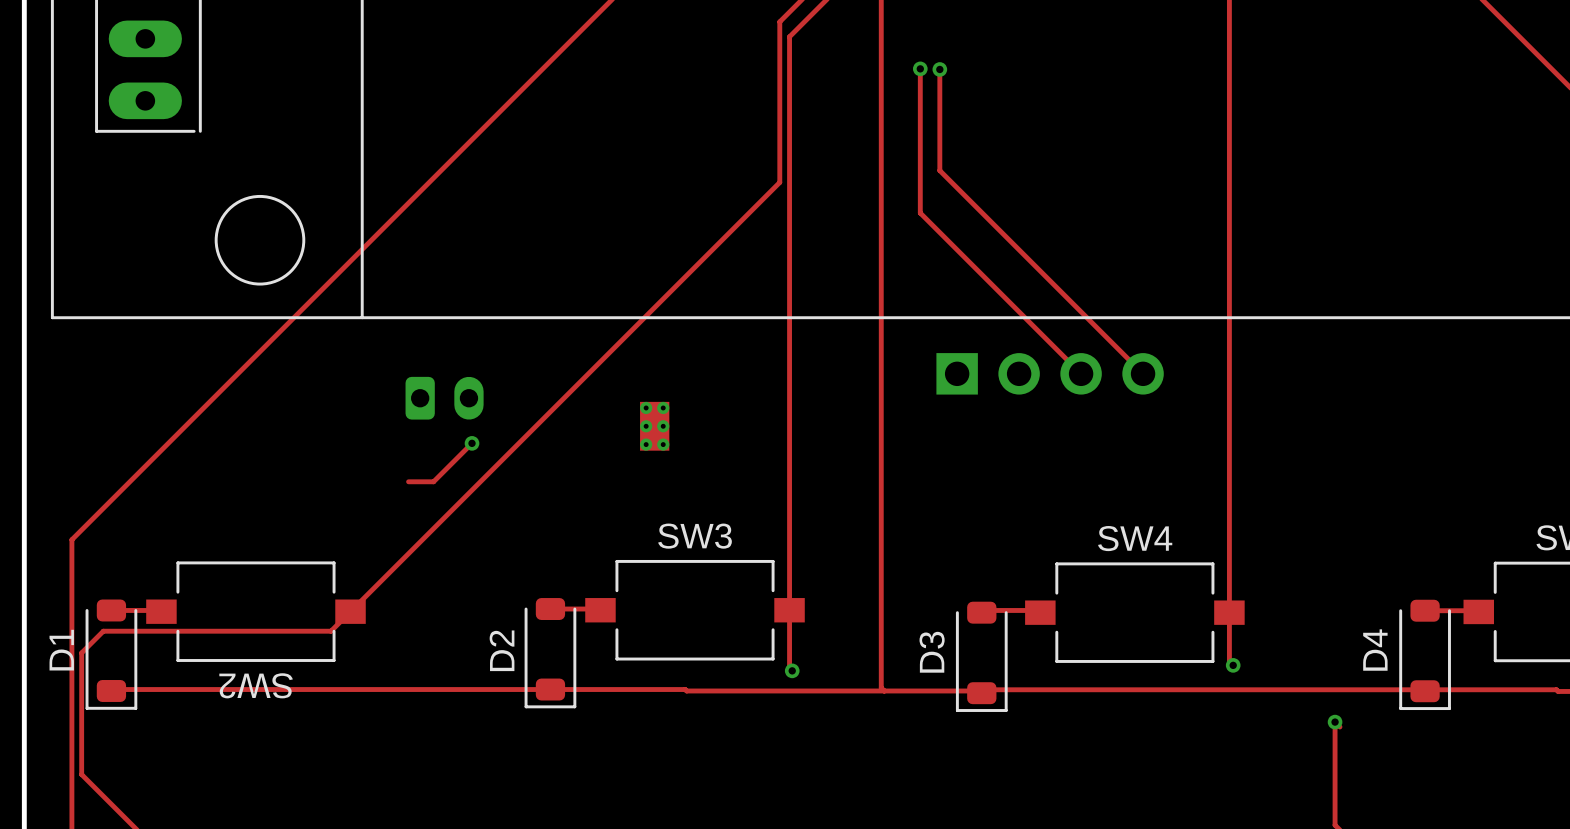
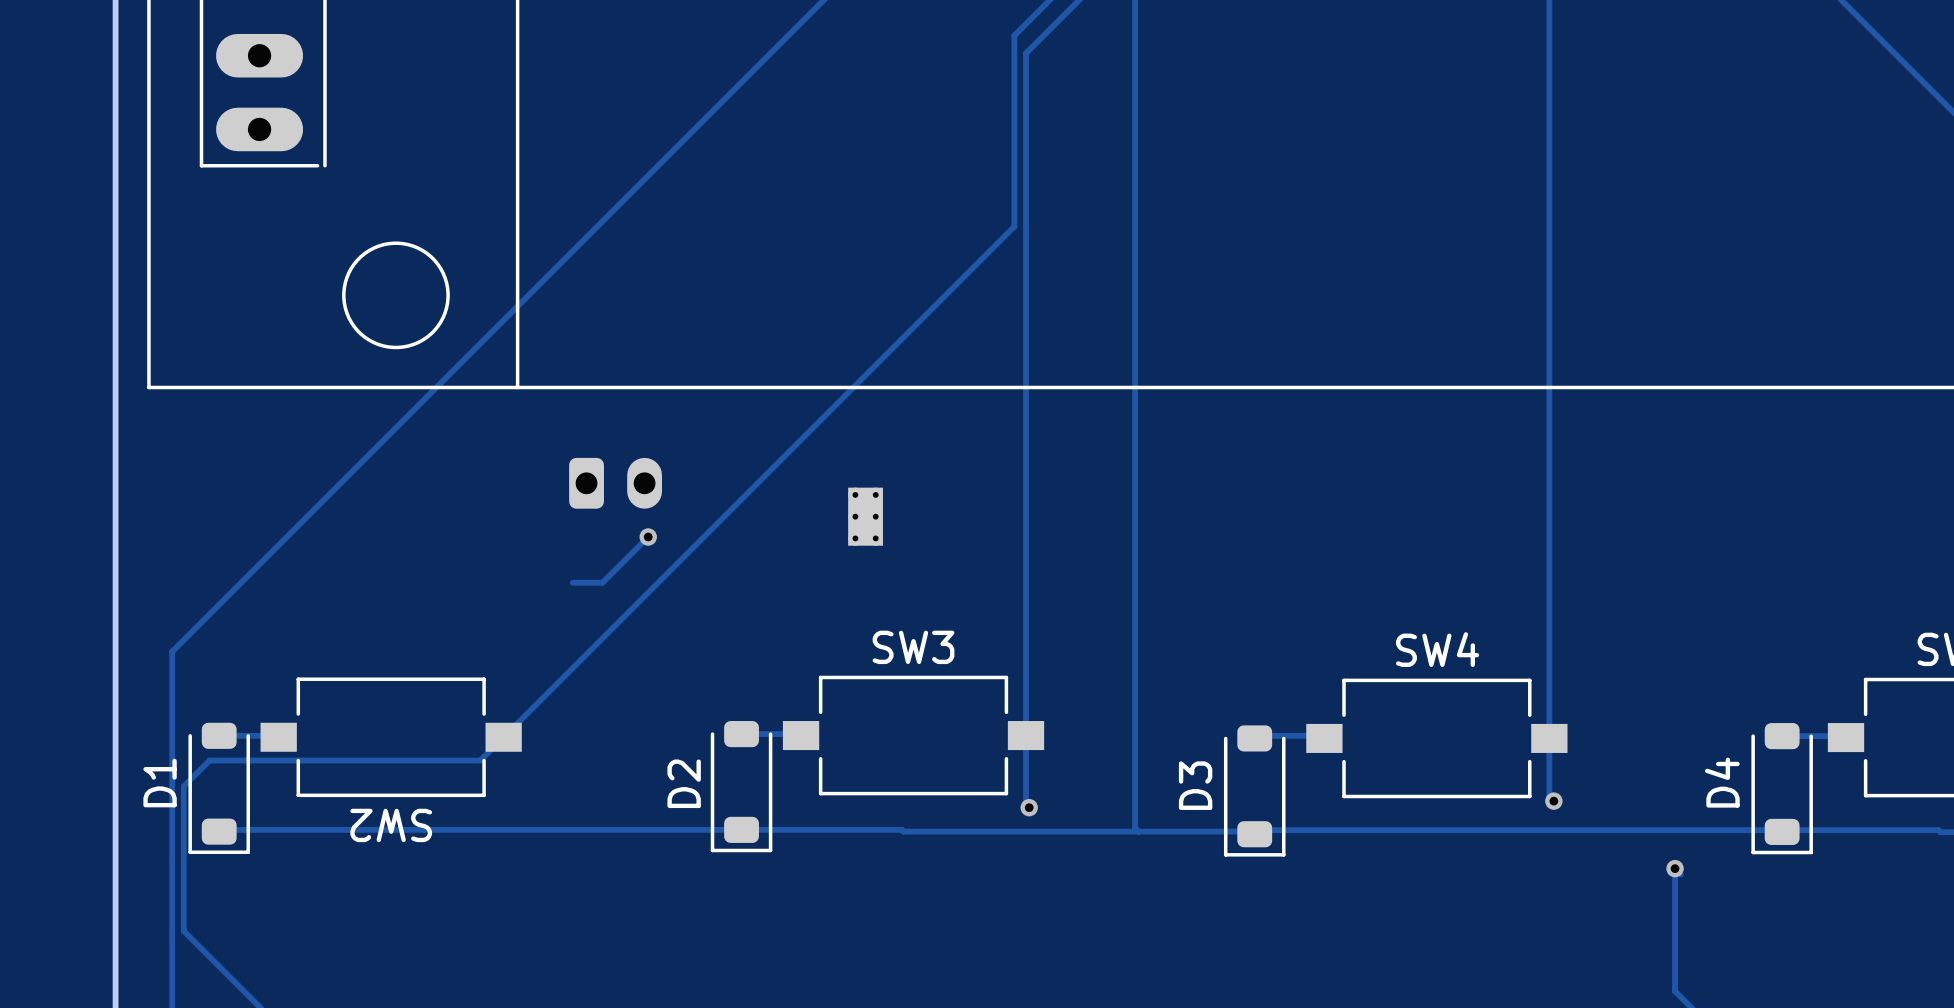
track: (920, 68) (920, 213) (1081, 373) -> none
via: (920, 68) -> none
track: (939, 69) (939, 170) (1143, 373) -> none
via: (939, 69) -> none
part: (1050, 373) -> none

